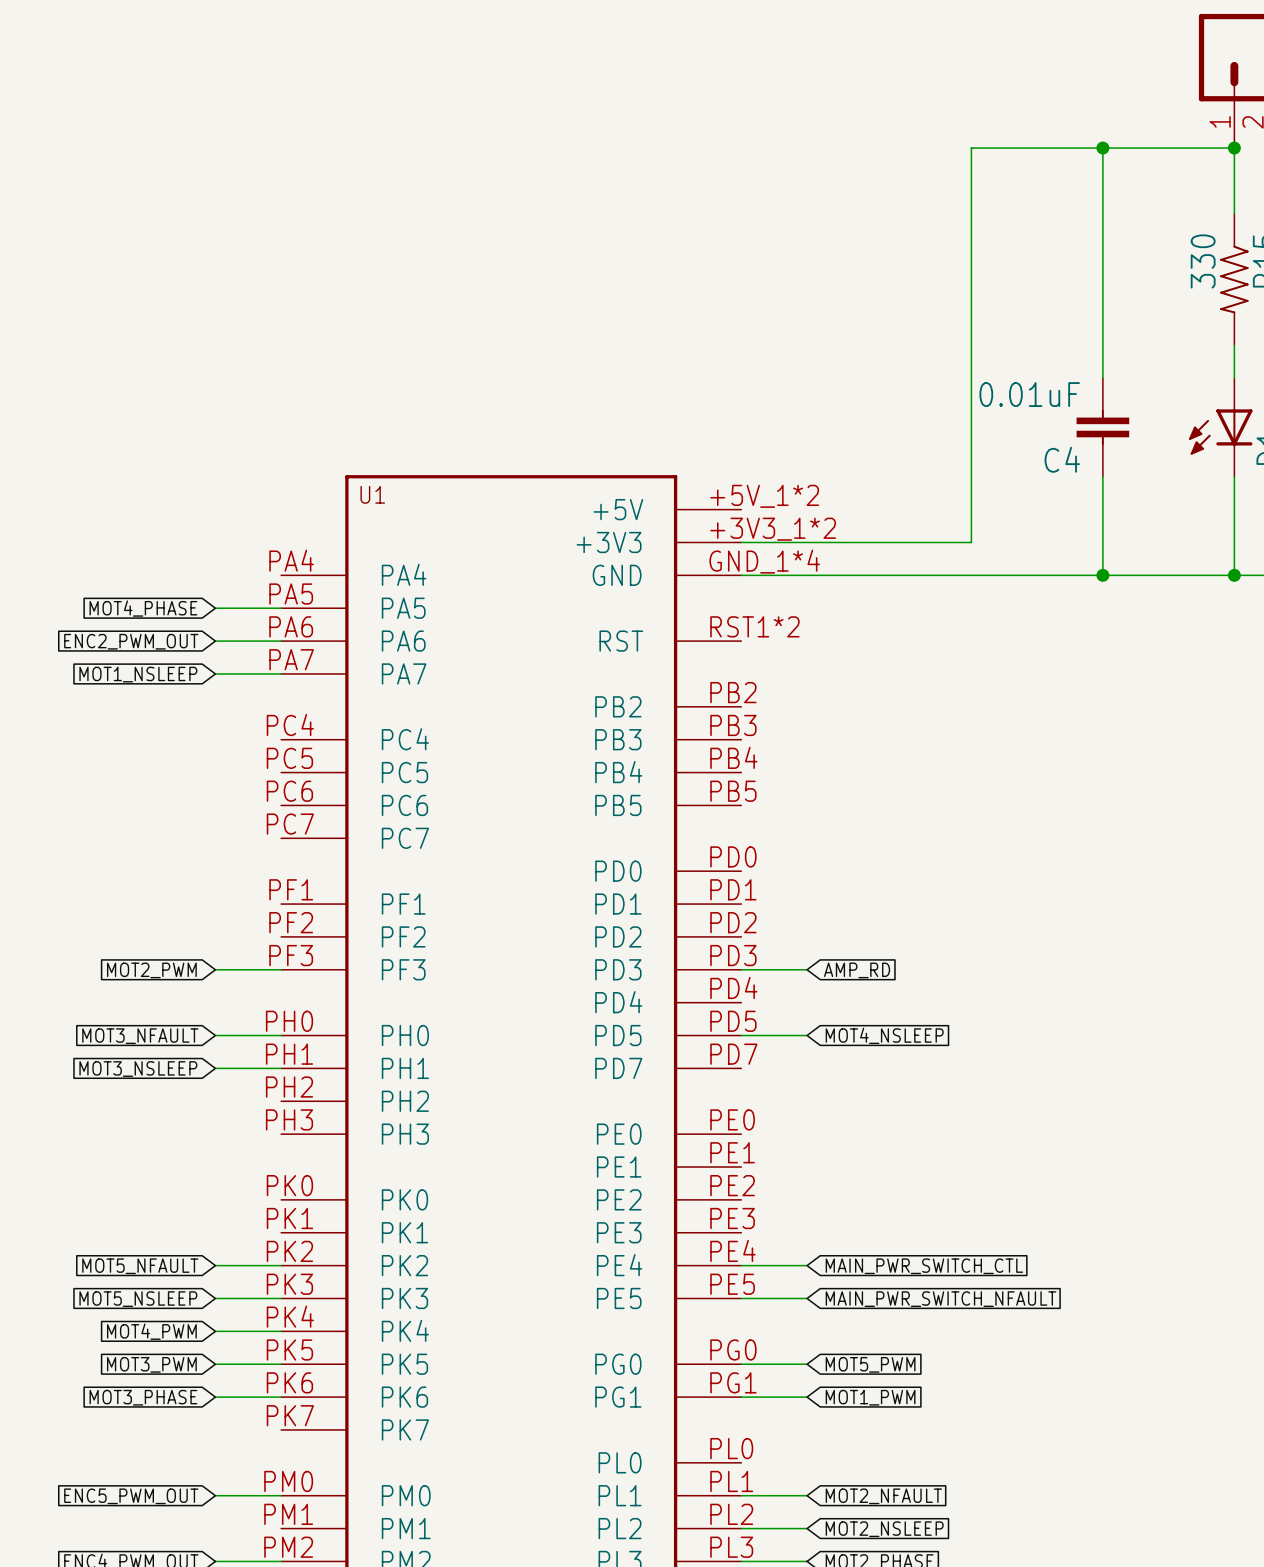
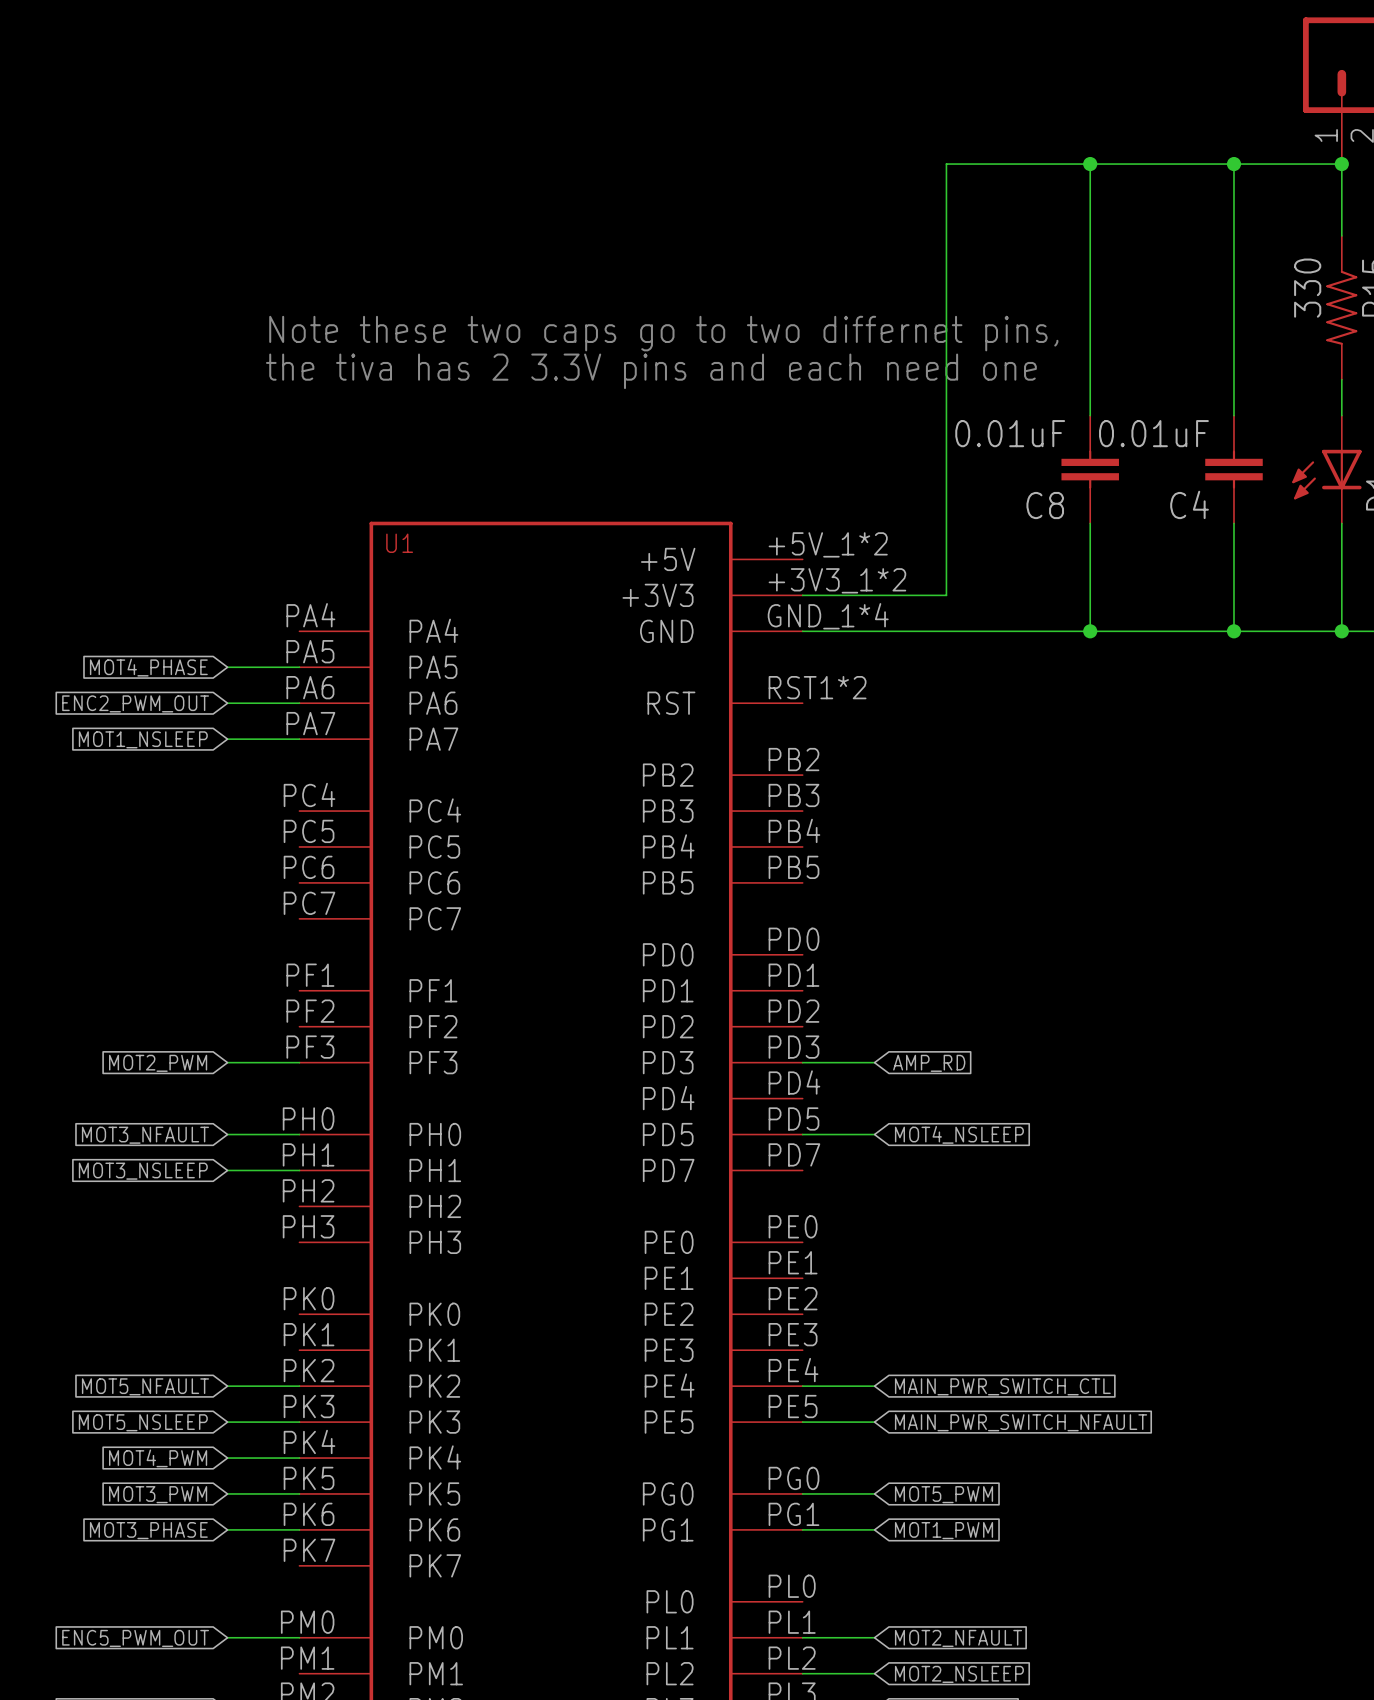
wire: (971, 148) (971, 542) (872, 542) -> (1054, 164) (946, 164) (946, 595)
wire: none -> (1090, 164) (1090, 415)
junction: none -> (1090, 164)
wire: (1102, 148) (1102, 378) -> (1233, 164) (1233, 415)
junction position: (1102, 148) -> (1233, 164)
text: none -> Note these two caps go to two differnet pins, (663, 333)
text: none -> the tiva has 2 3.3V pins and each need one (651, 371)
C8: none -> 0.01uF (1090, 469)
C4 position: (1102, 427) -> (1233, 469)
wire: none -> (1090, 523) (1090, 631)
wire: (1102, 476) (1102, 575) -> (1233, 523) (1233, 631)
junction: none -> (1090, 631)
junction position: (1102, 575) -> (1233, 631)

